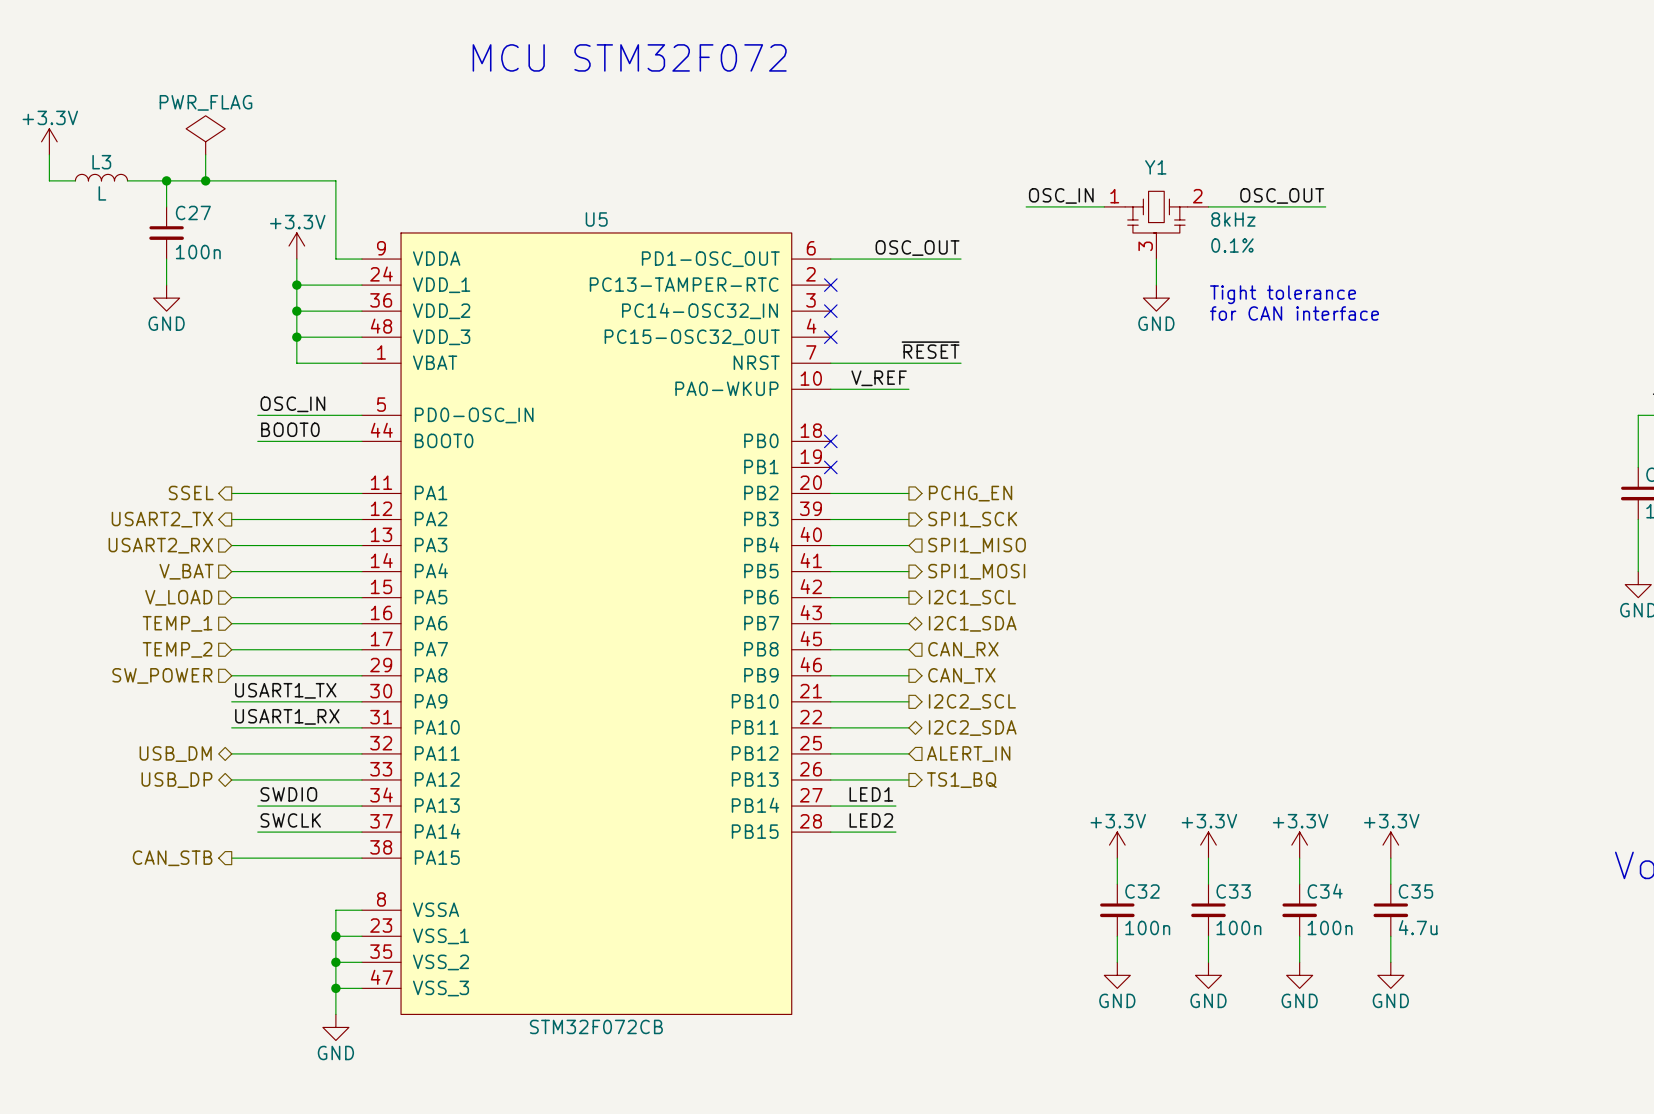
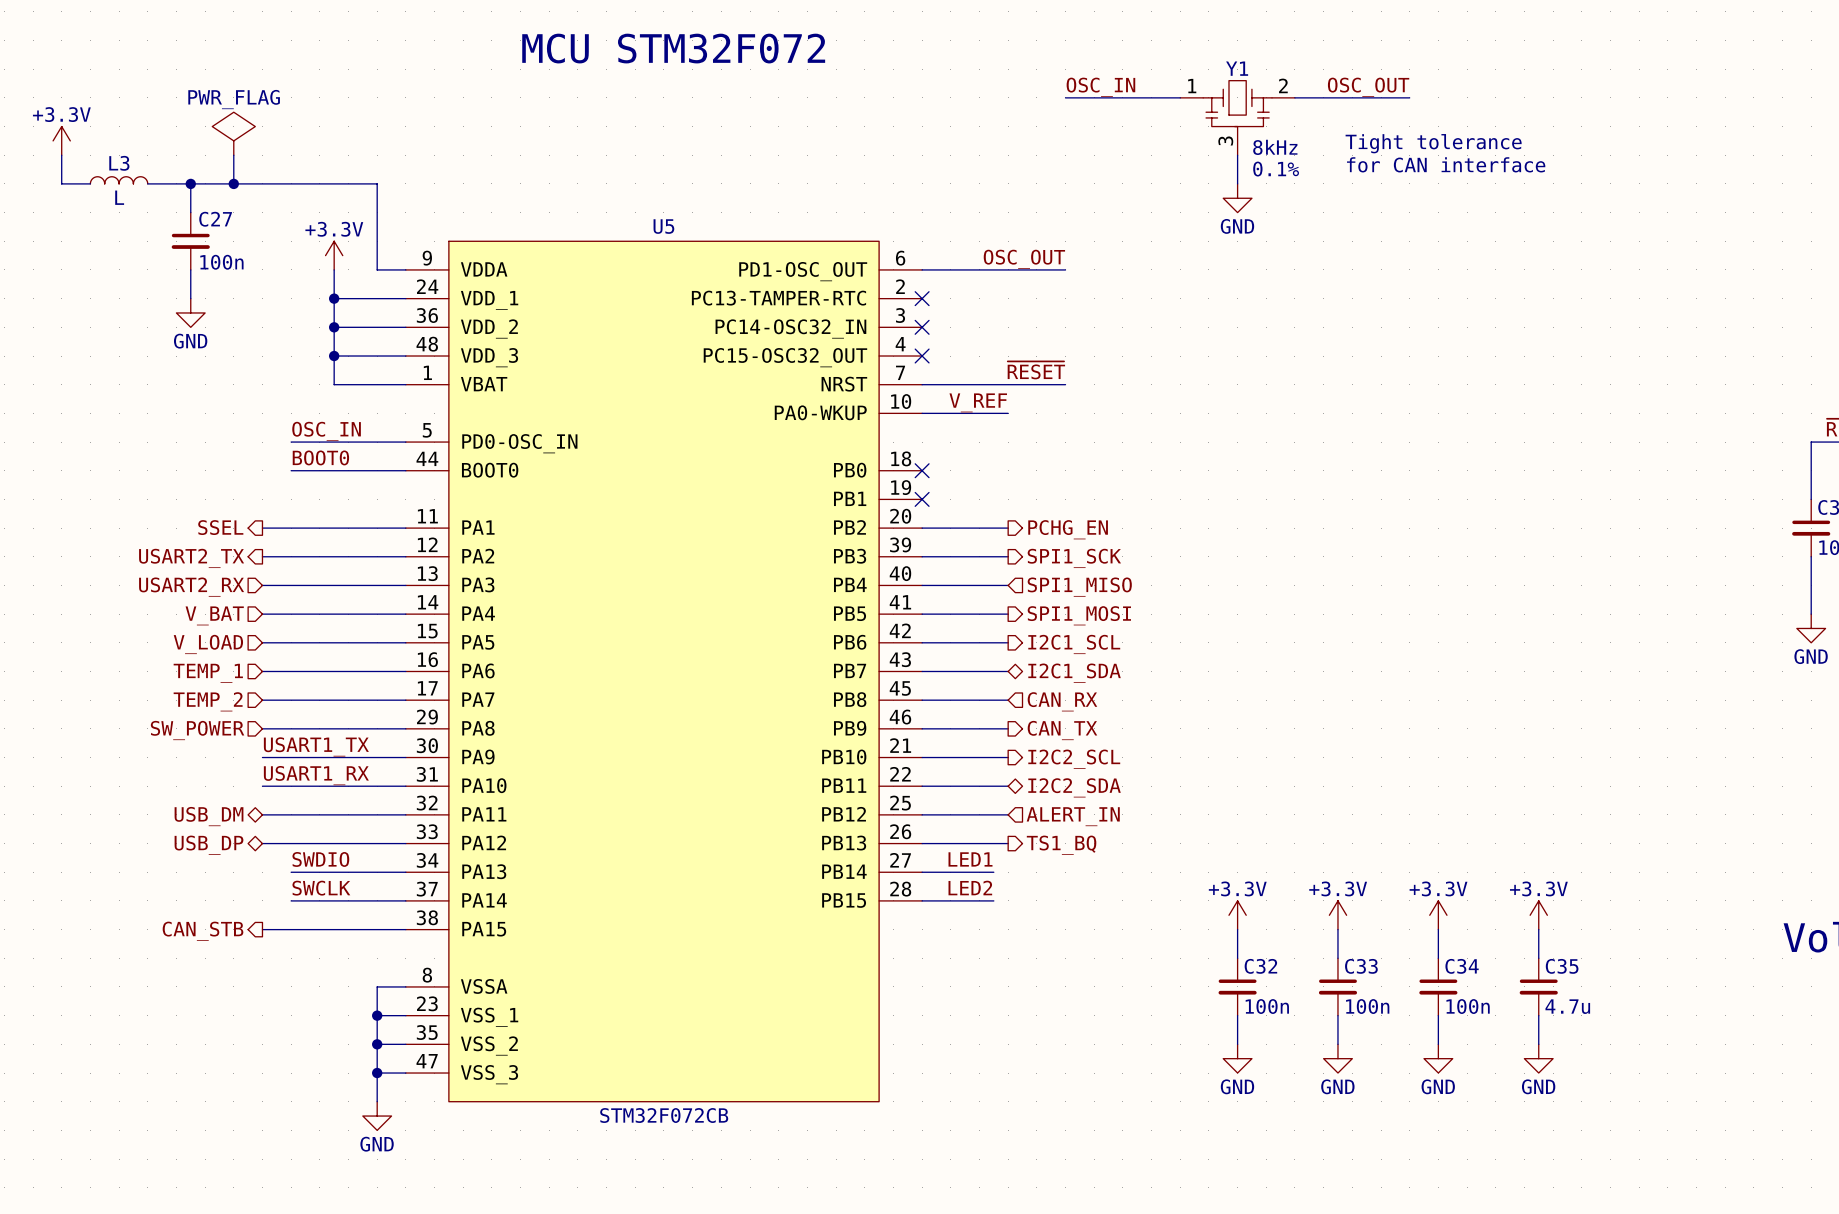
wire: none -> (1065, 97) (1180, 97)
wire: none -> (1294, 97) (1409, 97)
Y1 name position: Y1 (1155, 167) -> Y1 (1237, 68)
label position: OSC_IN (1061, 195) -> OSC_IN (1100, 87)
label position: OSC_OUT (1282, 195) -> OSC_OUT (1368, 87)
wire: (1026, 206) (1104, 206) -> none
wire: (1208, 206) (1325, 206) -> none
Y1 value position: 8kHz (1233, 219) -> 8kHz (1275, 147)
Y1 position: (1156, 225) -> (1237, 117)
Y1 text position: 0.1% (1232, 245) -> 0.1% (1276, 169)
wire: (1156, 259) (1156, 285) -> (1237, 155) (1237, 183)
text position: Tight tolerance (1283, 294) -> Tight tolerance (1433, 143)
power symbol position: GND (1156, 298) -> GND (1237, 198)
text position: for CAN interface (1294, 313) -> for CAN interface (1446, 164)

